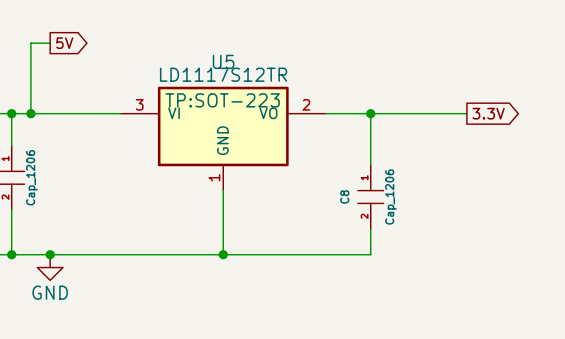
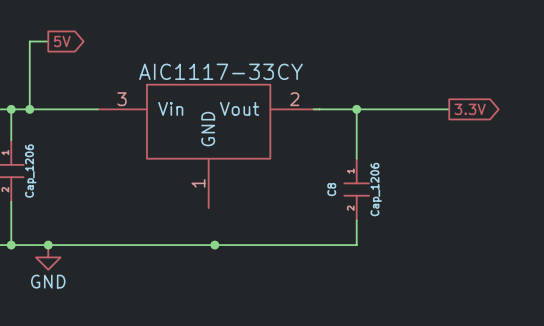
U5: LD1117S12TR (223, 138) -> none
power symbol: none -> AIC1117-33CY (208, 146)
wire: (223, 190) (223, 254) -> none

